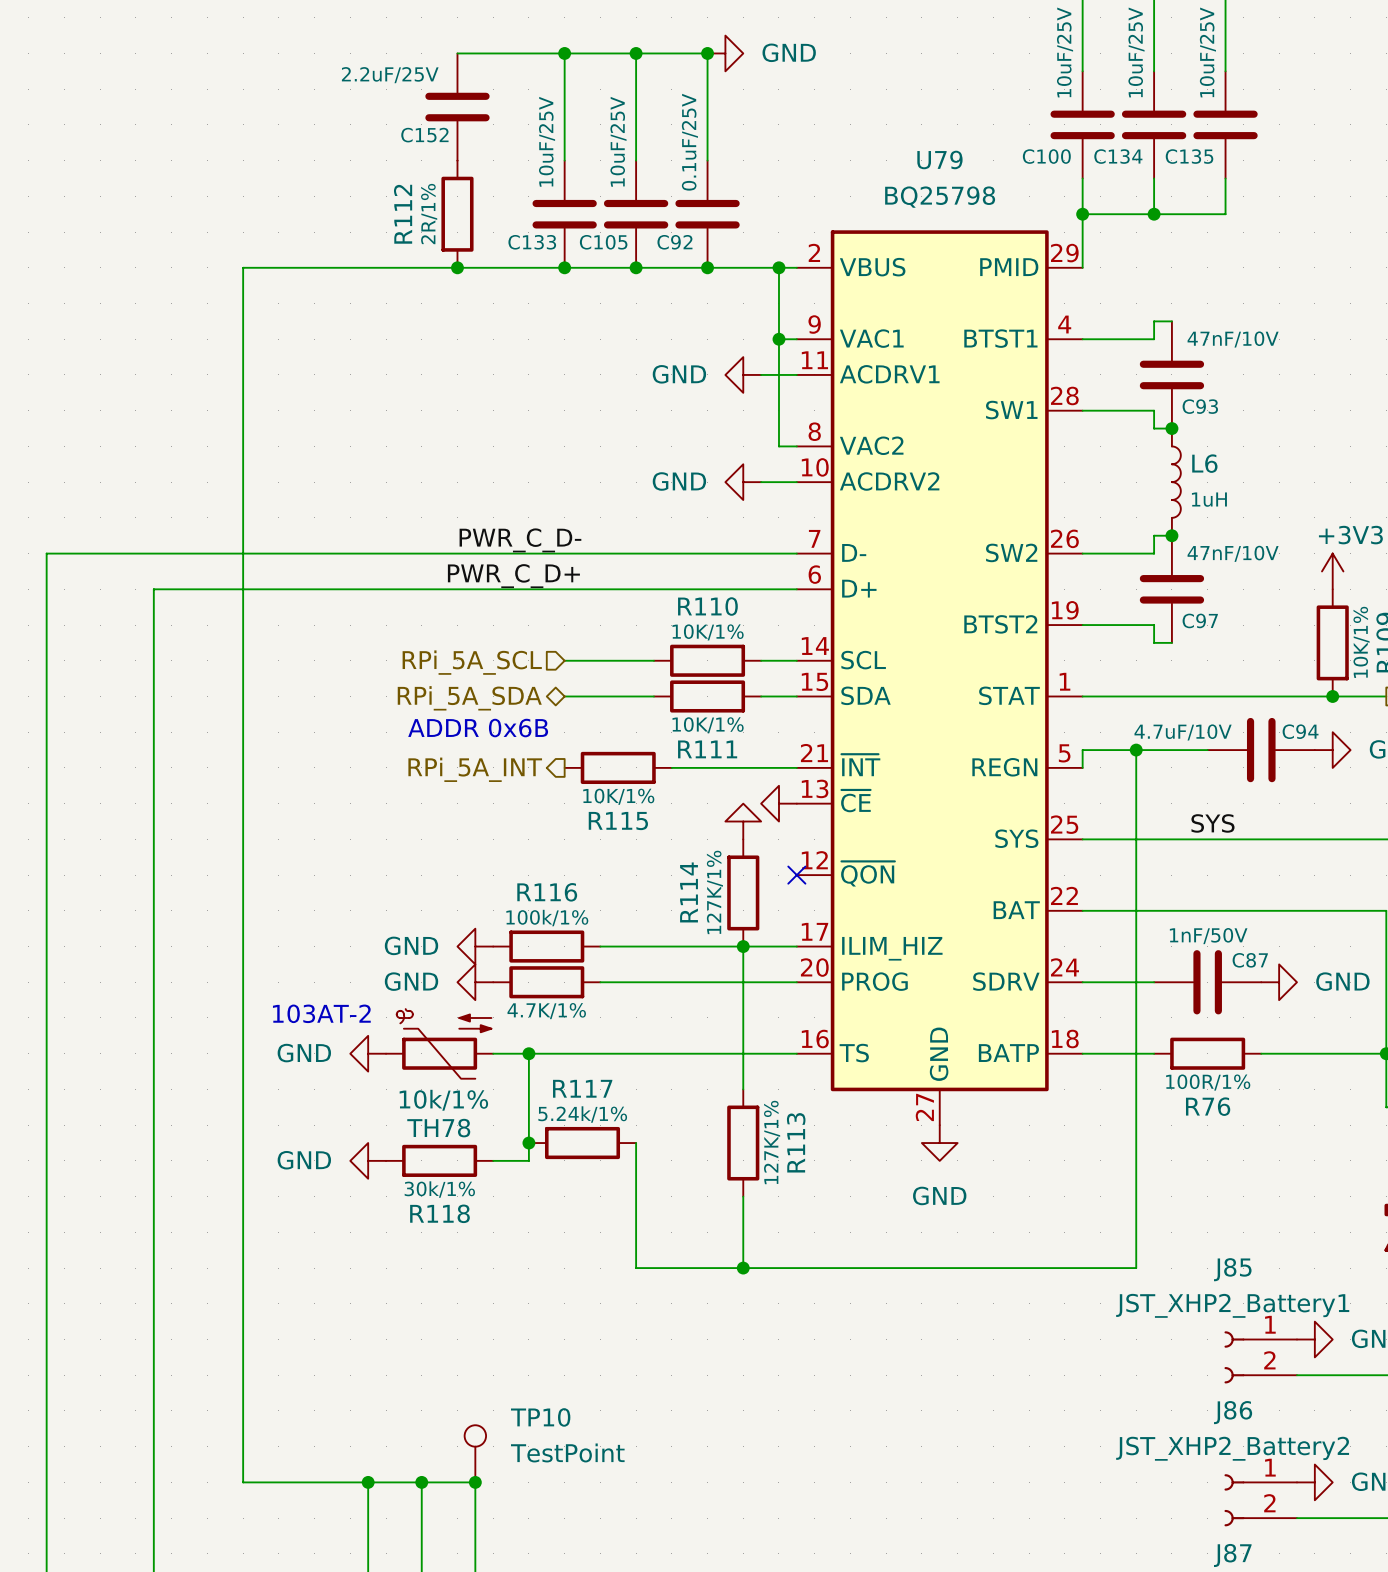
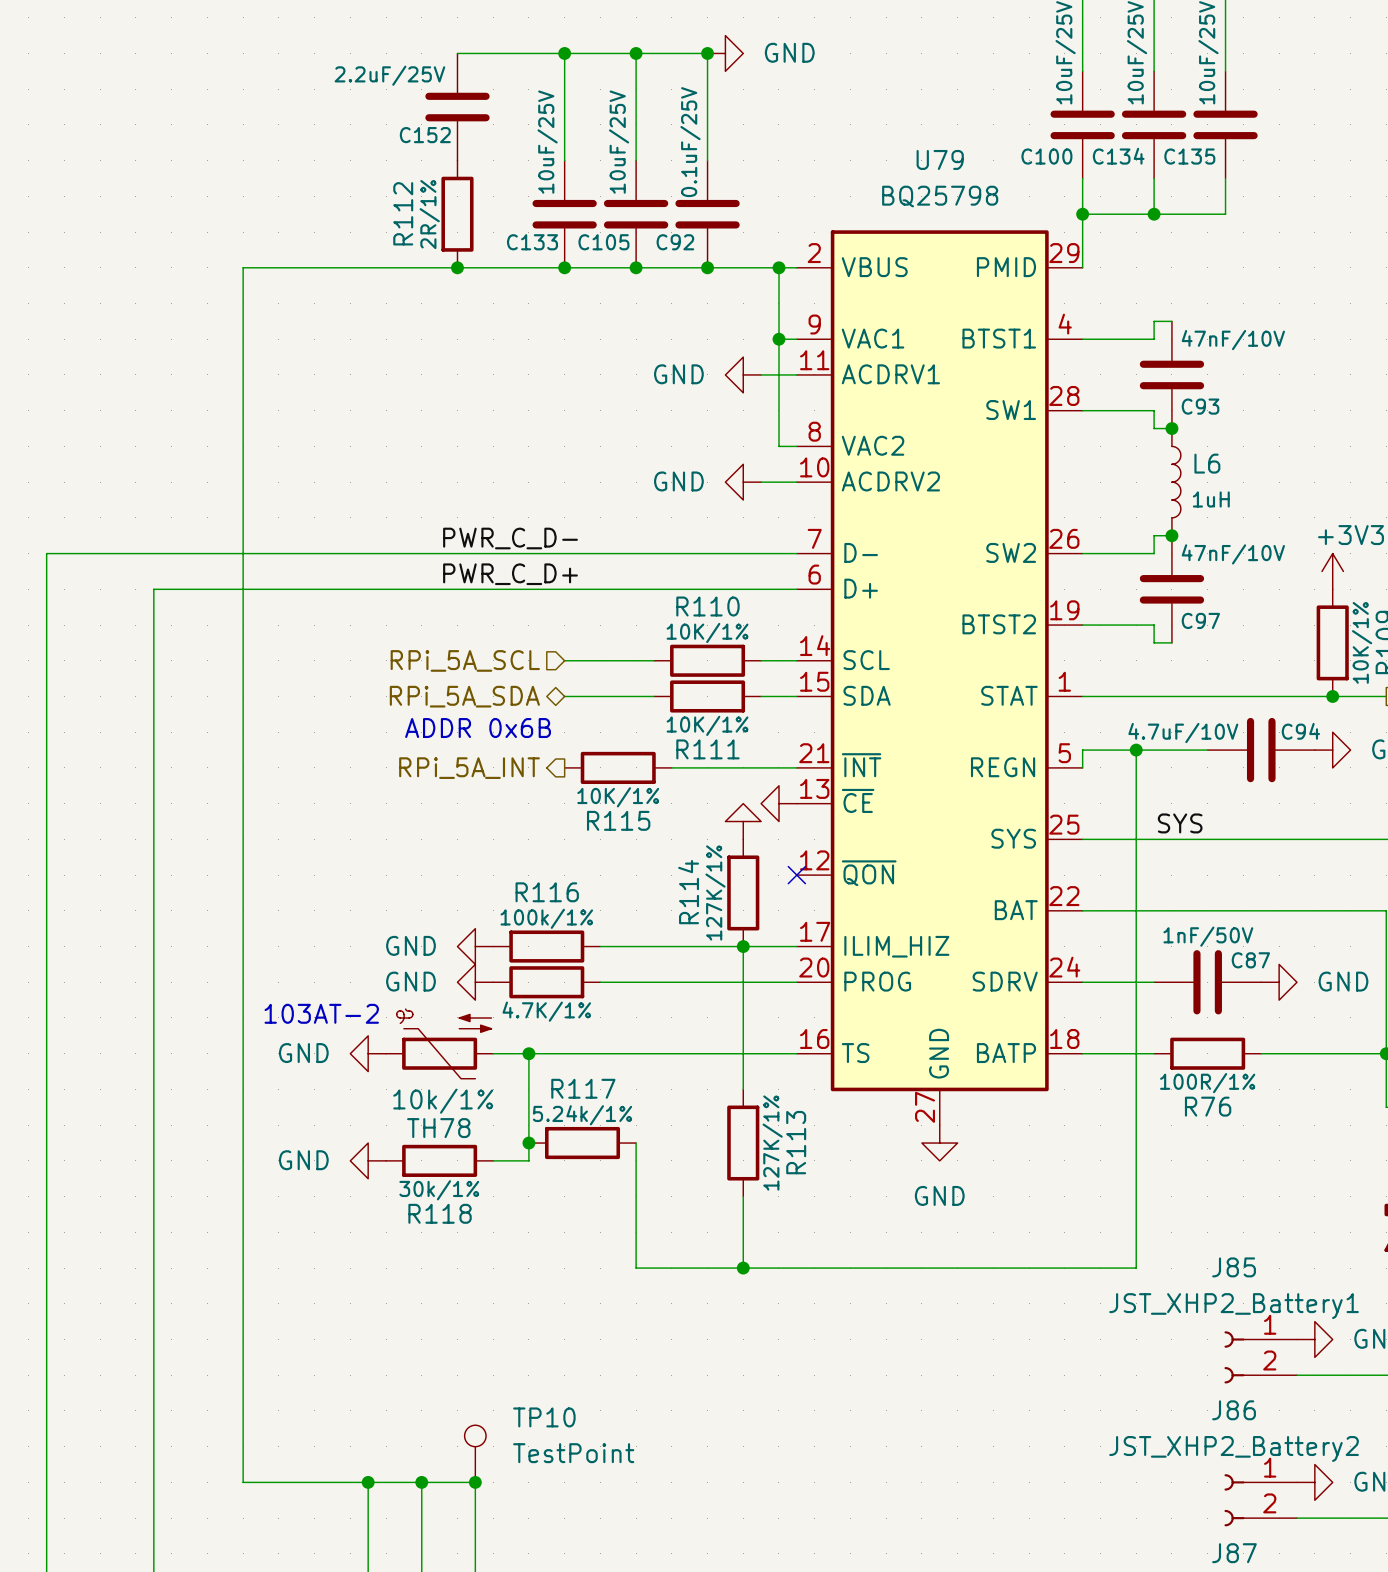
label position: SYS (1212, 823) -> SYS (1180, 823)

